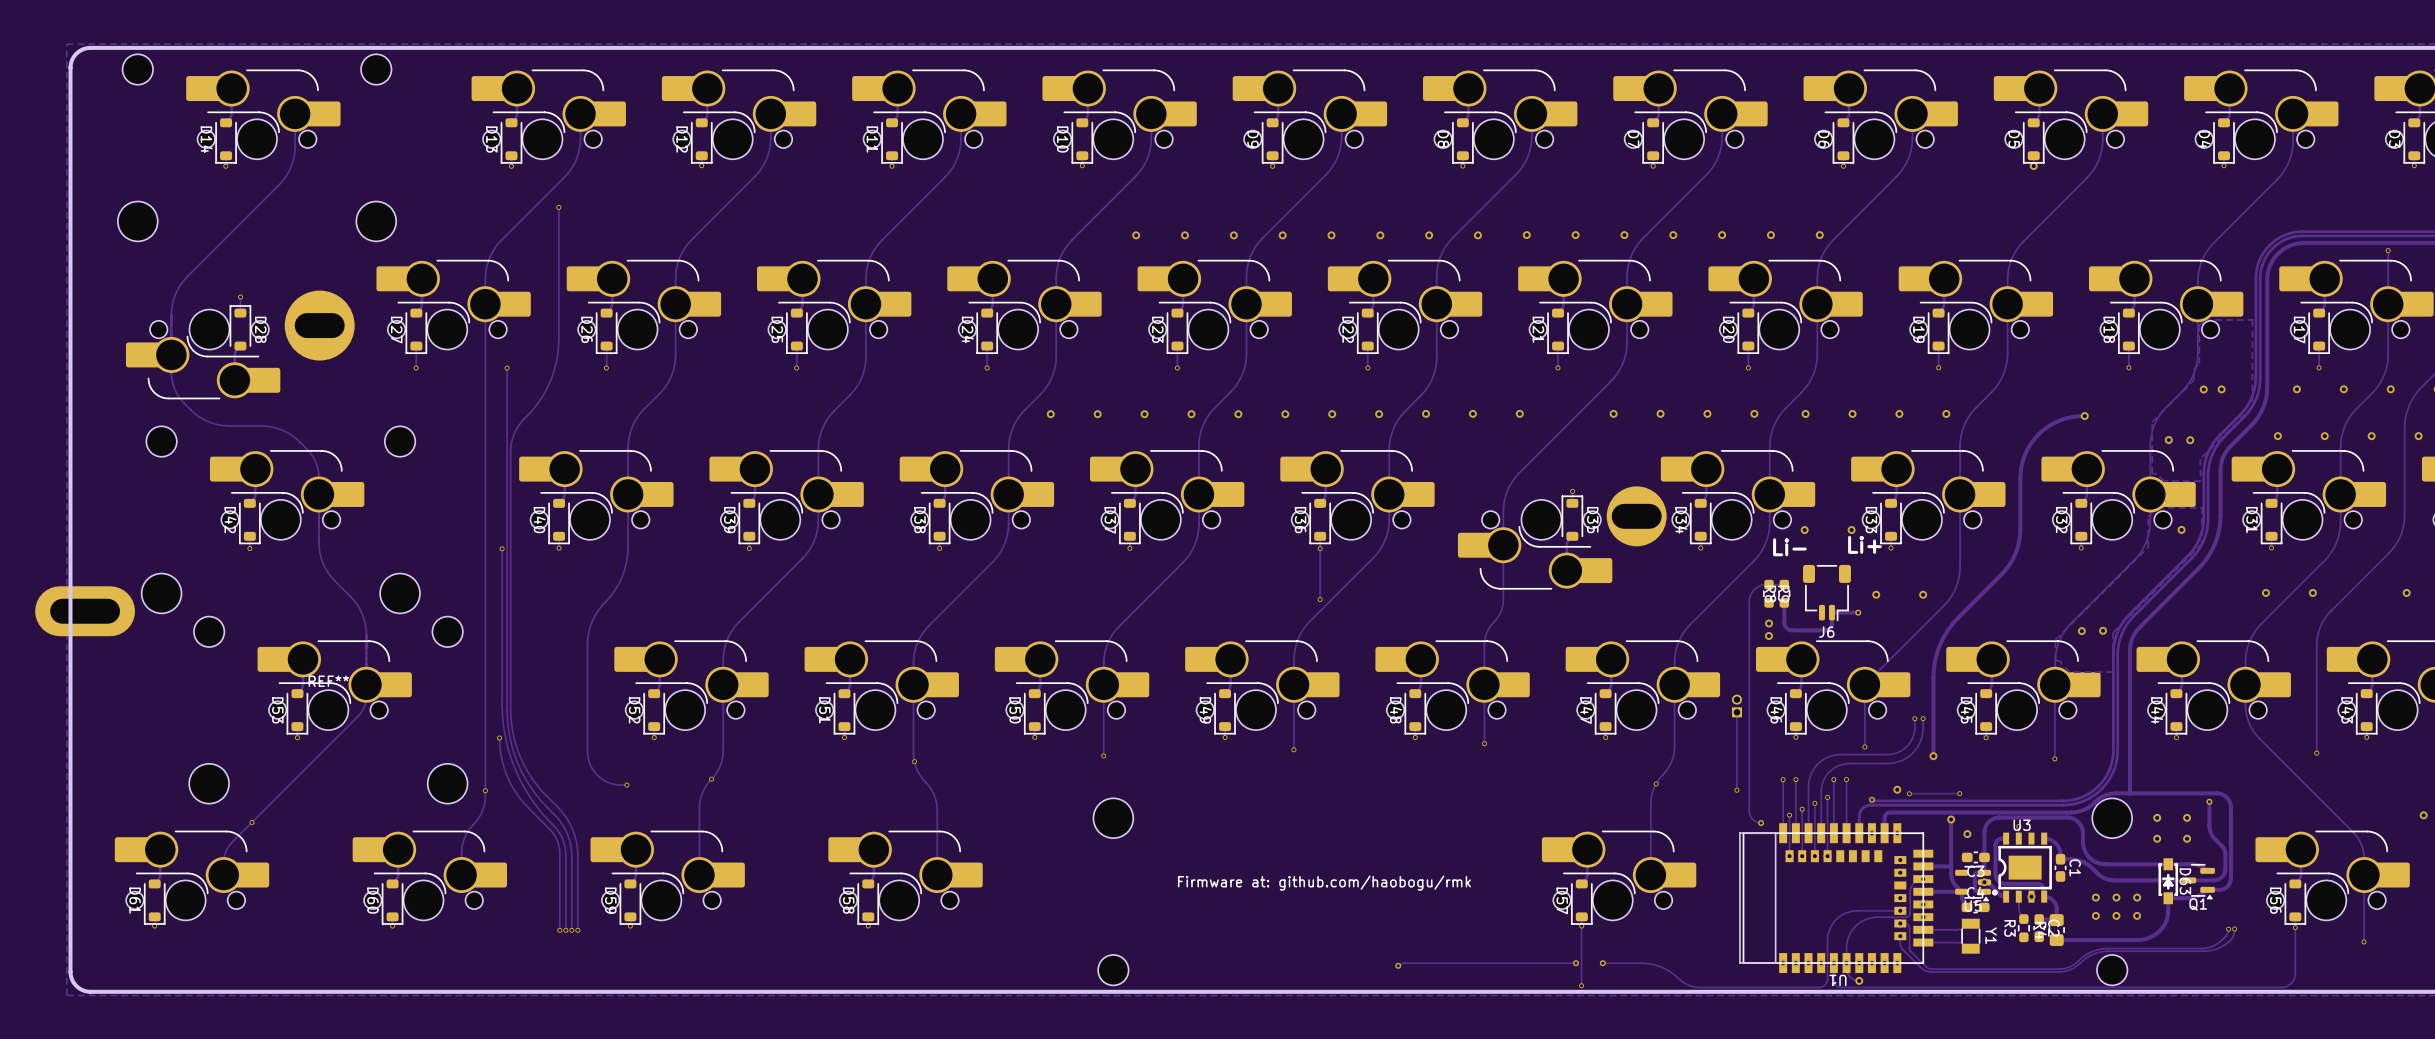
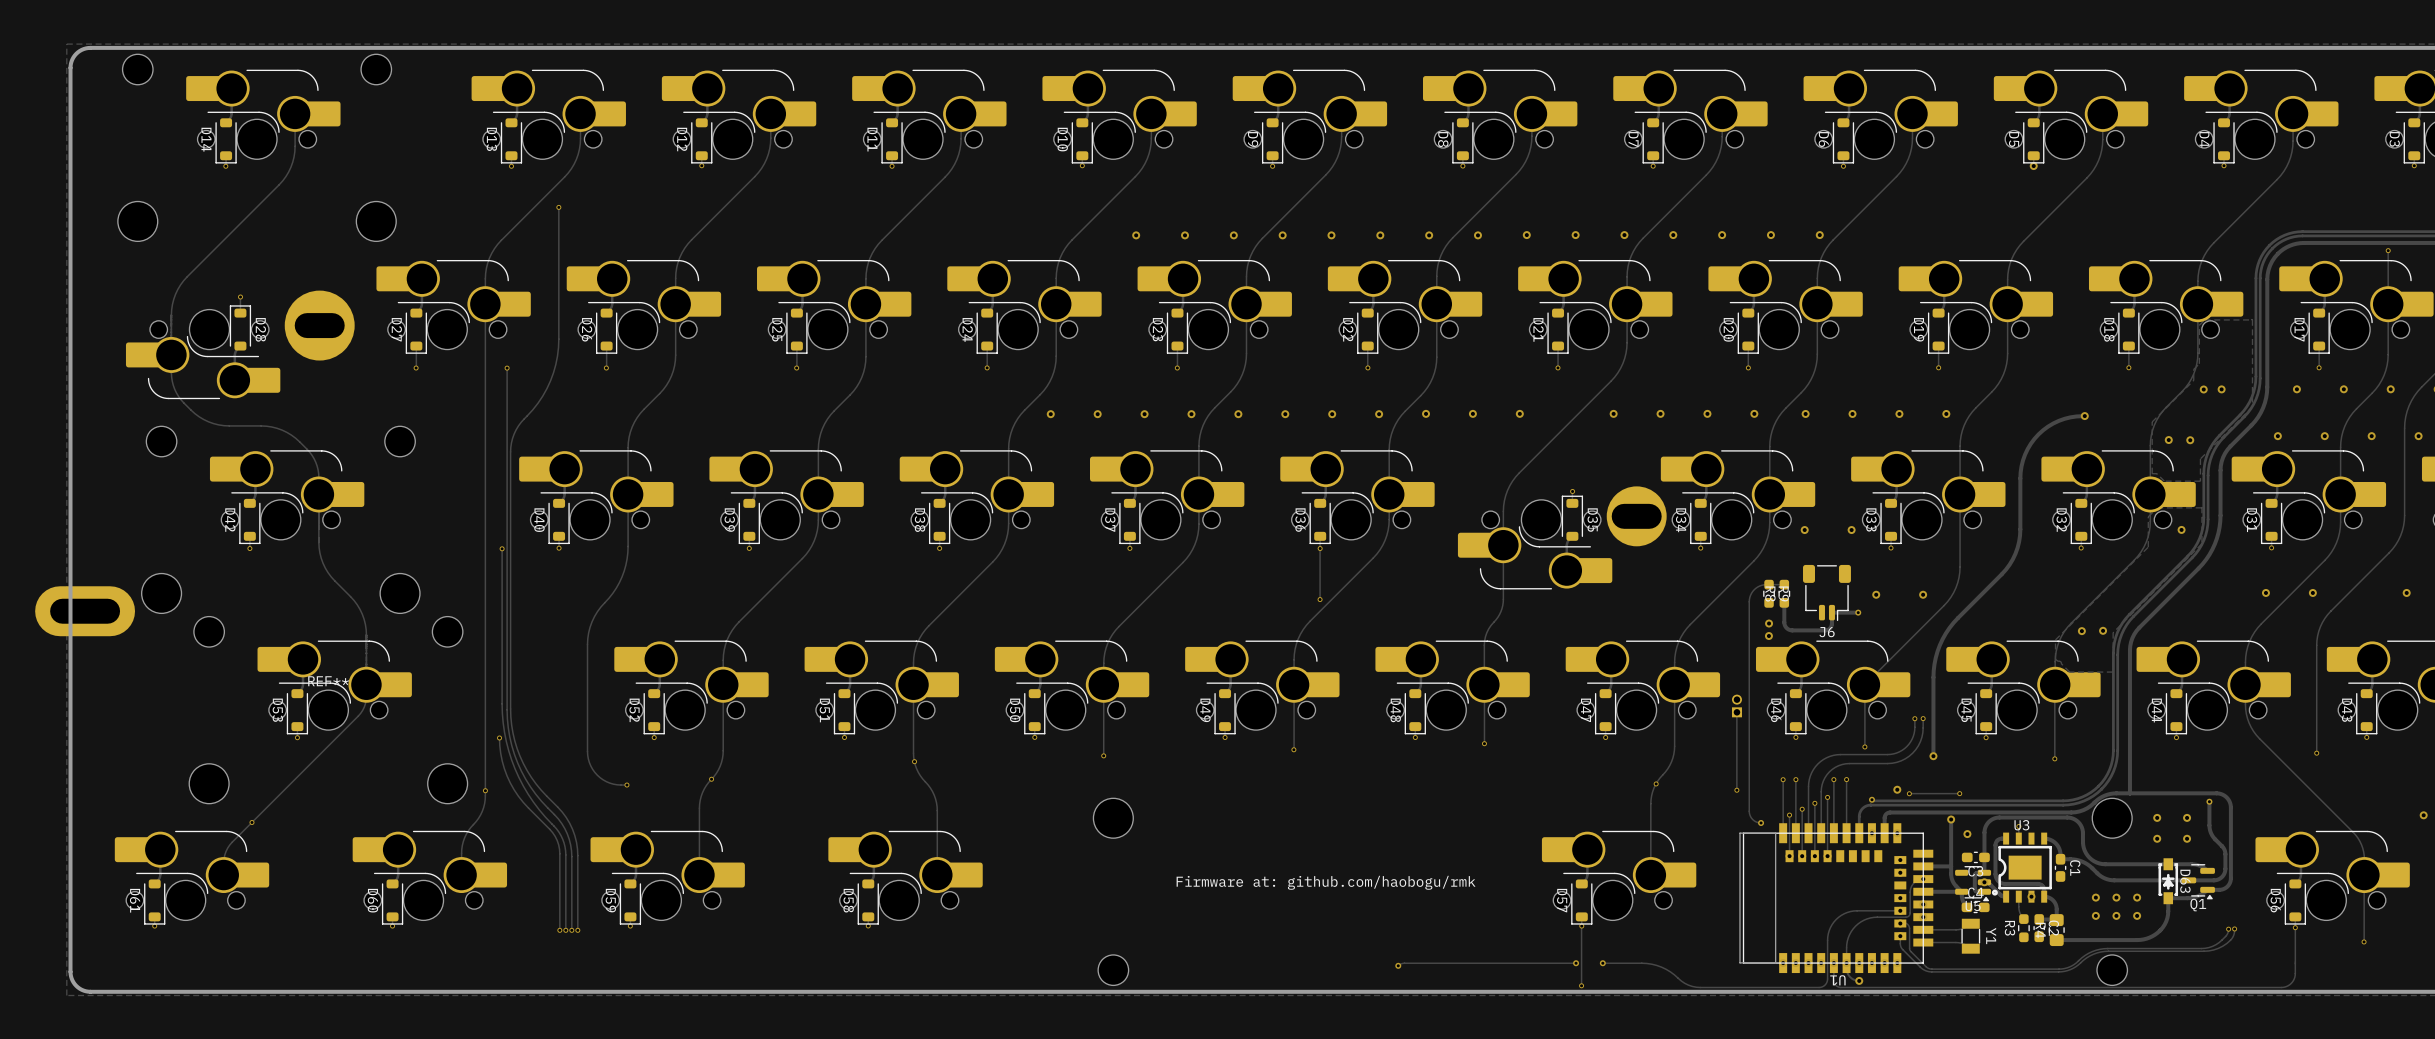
text: Li+ (1864, 544) -> none
text: Li- (1789, 547) -> none

